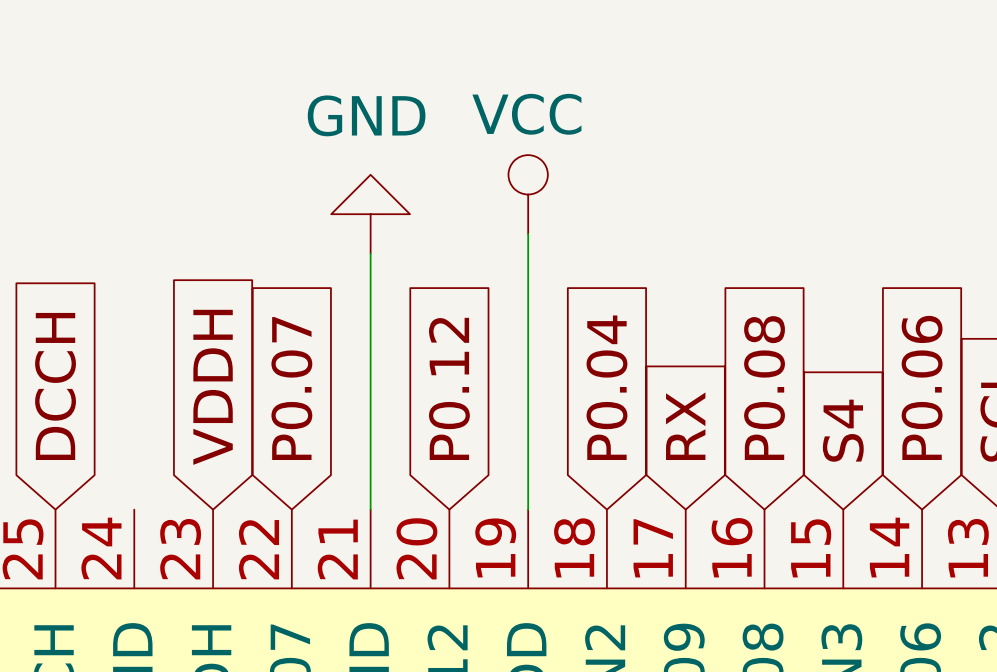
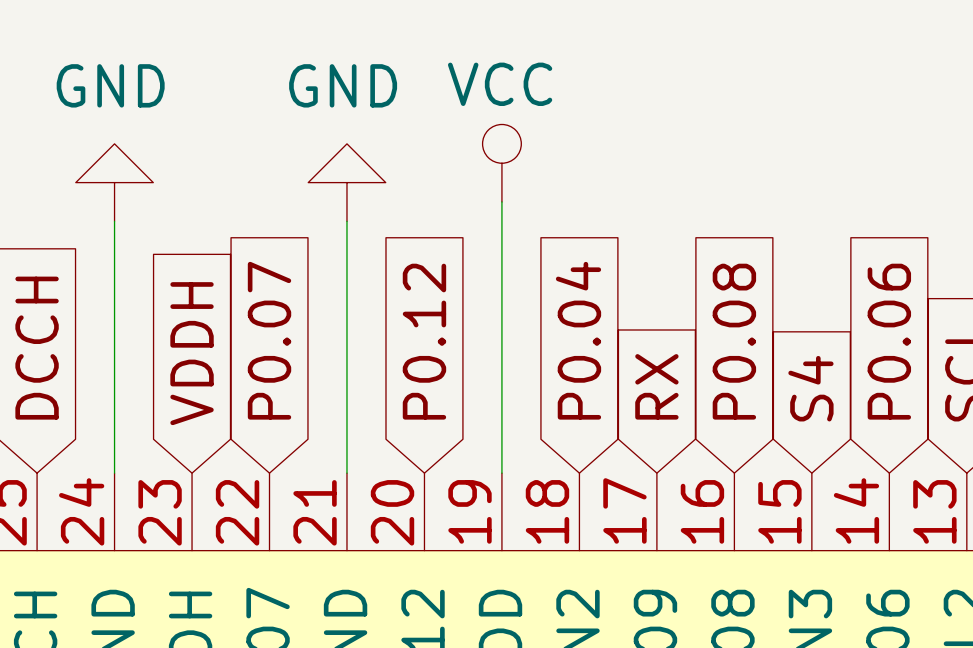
power symbol: none -> GND (114, 182)
wire: none -> (114, 221) (114, 473)

